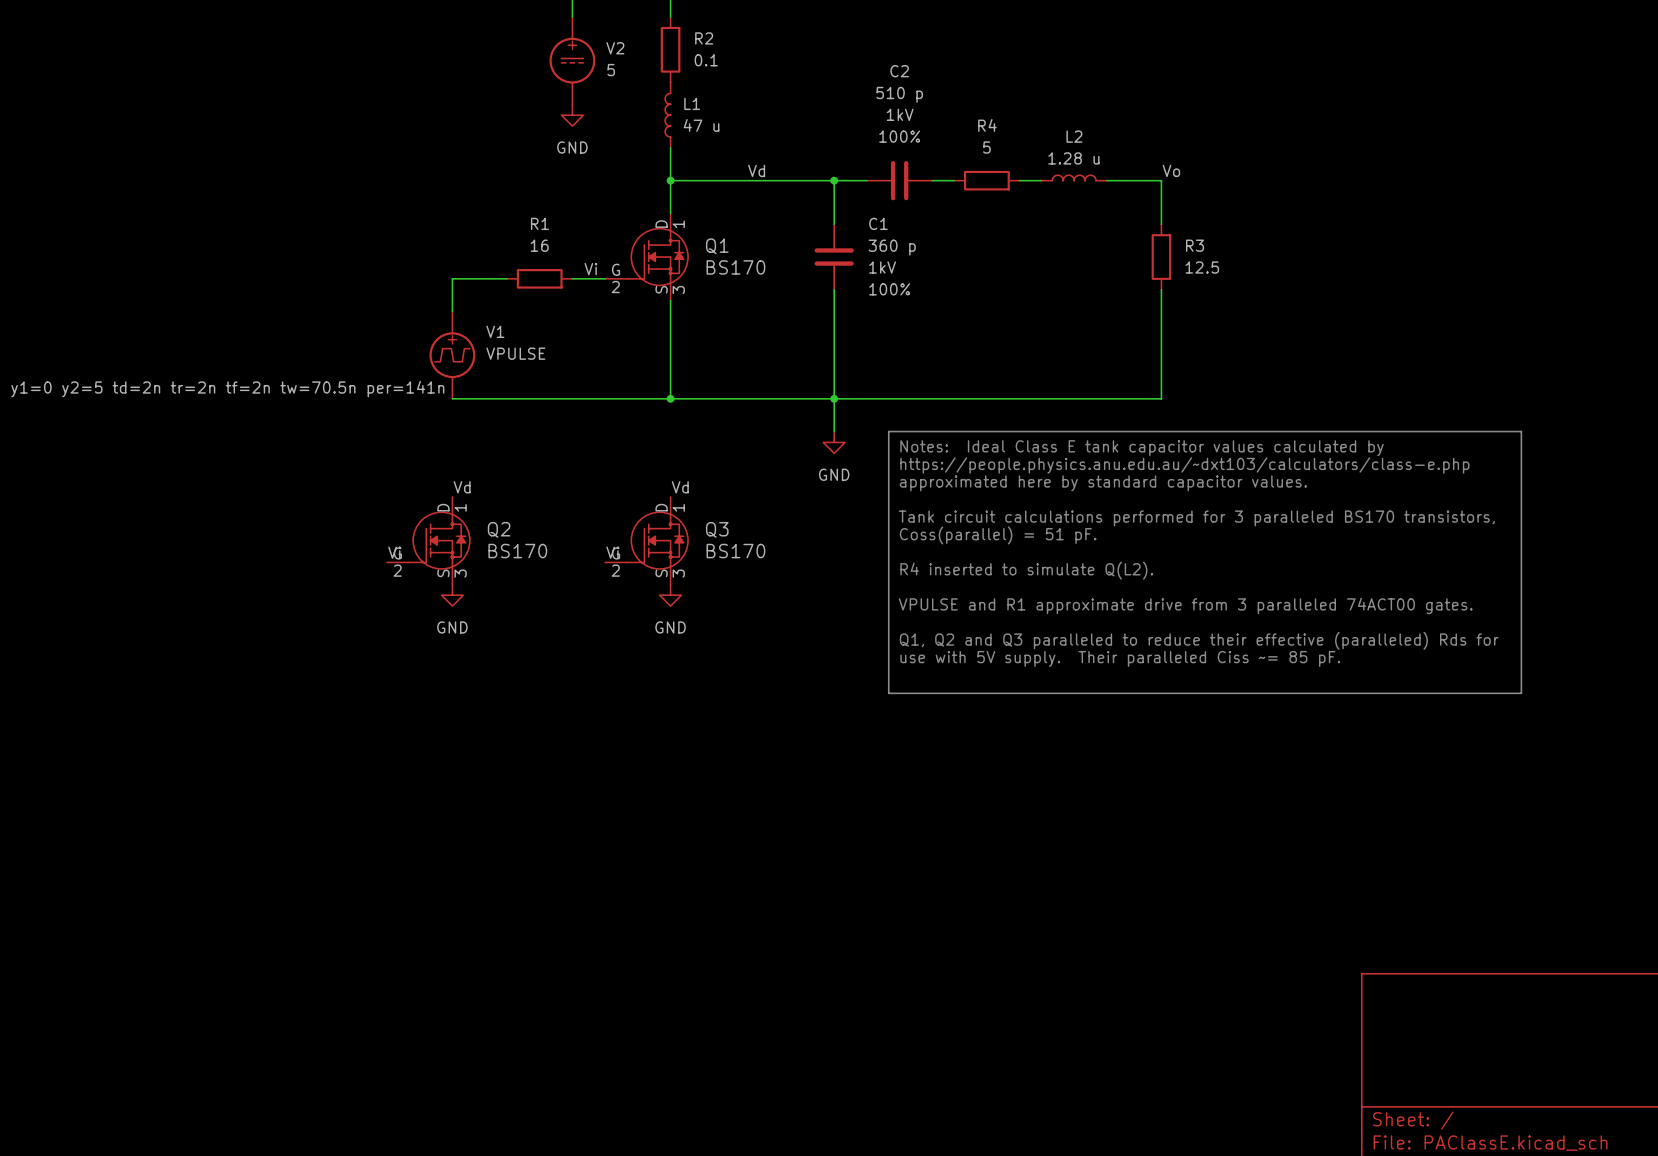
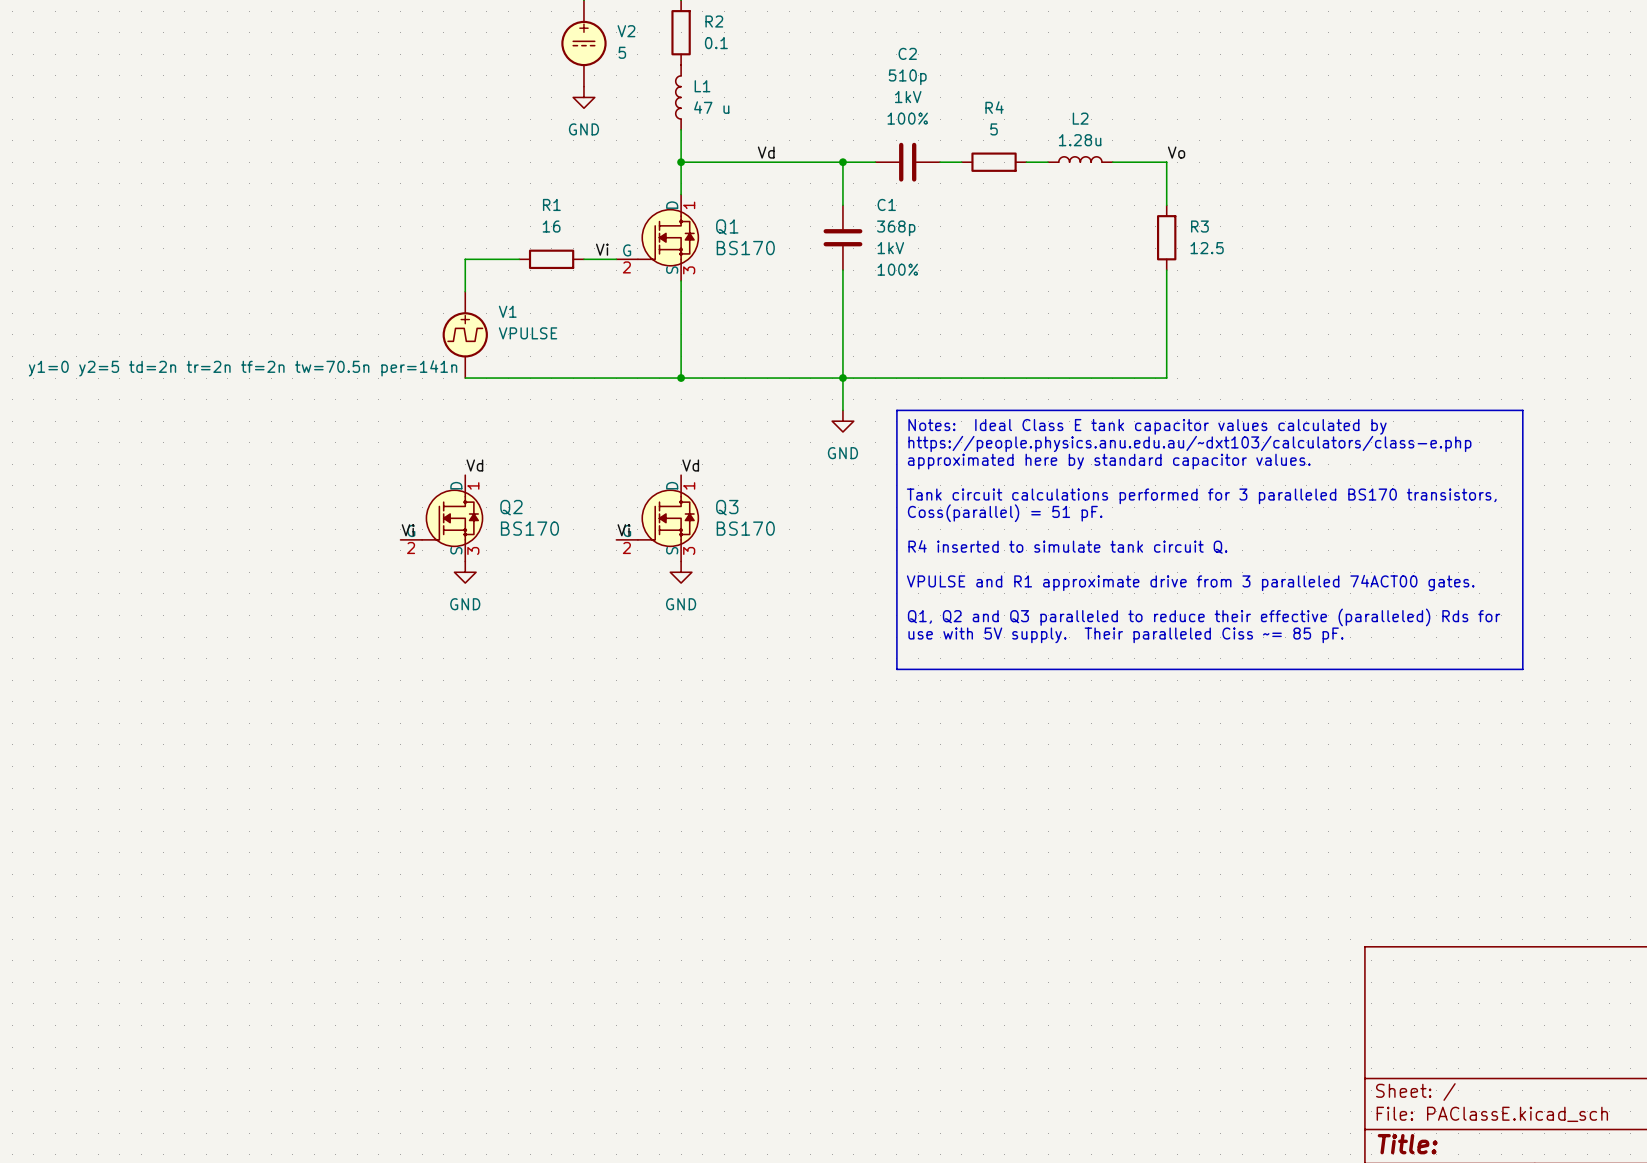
C2 value: 510 p (899, 94) -> 510p (907, 77)
L2 value: 1.28 u (1073, 158) -> 1.28u (1080, 140)
C1 value: 360 p (892, 247) -> 368p (896, 228)
text: R4 inserted to simulate Q(L2). (1026, 570) -> R4 inserted to simulate tank circuit Q. (1067, 546)

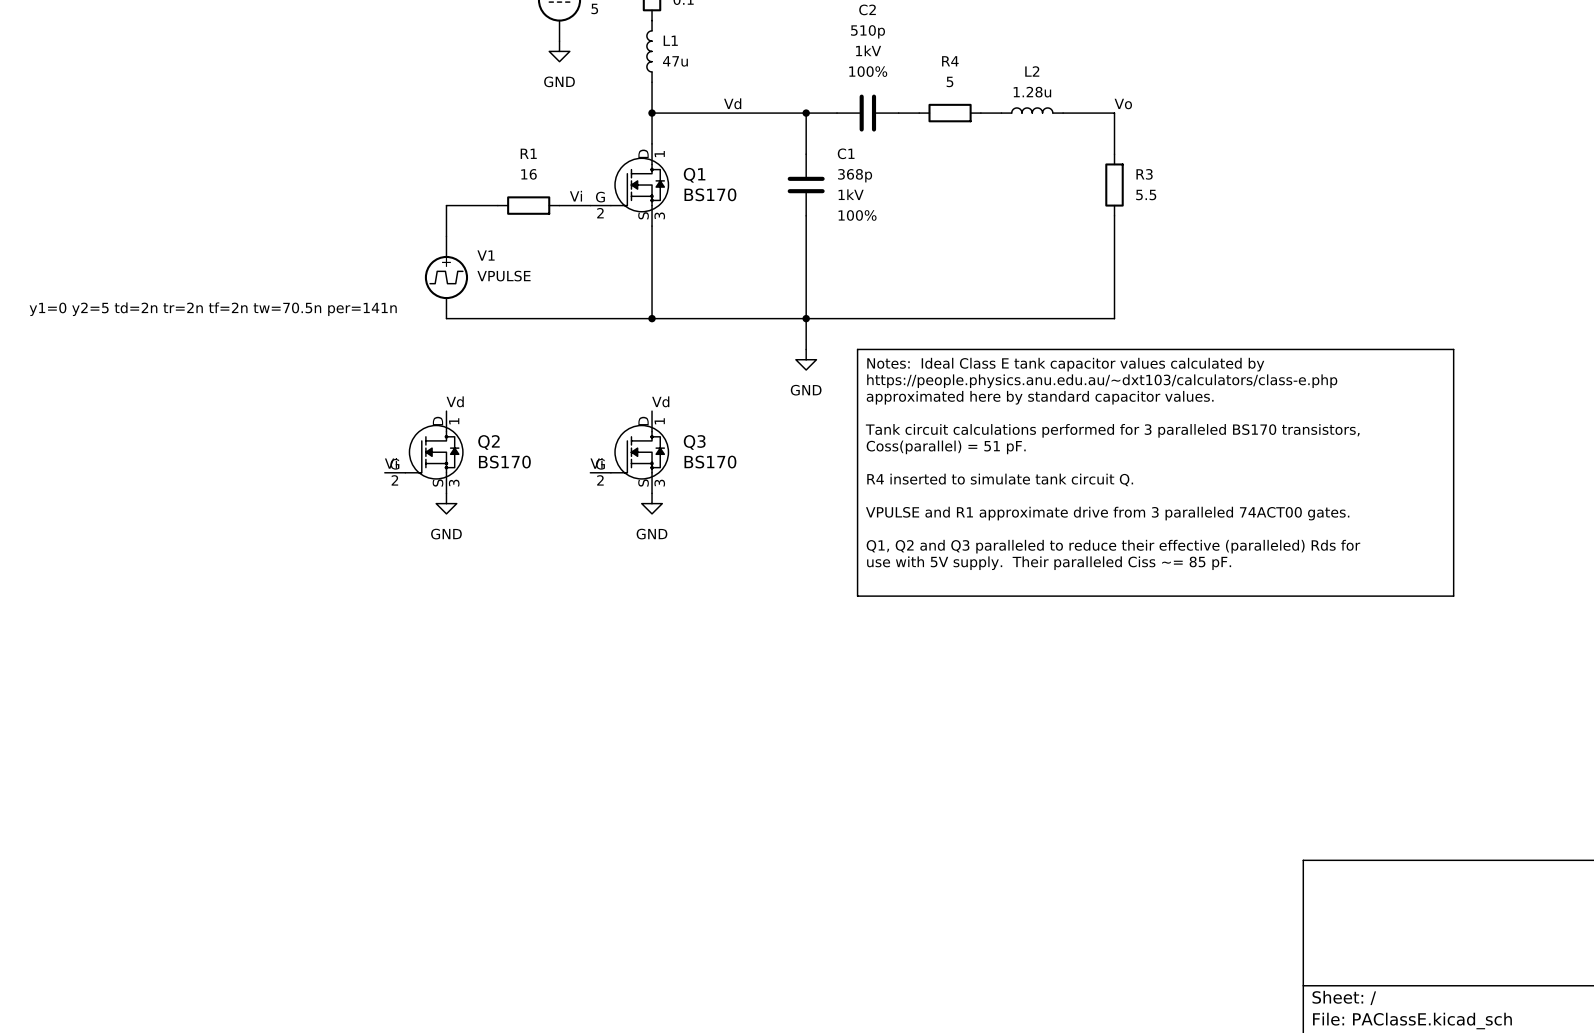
L1 value: 47 u (711, 107) -> 47u (675, 61)
R3 value: 12.5 (1207, 248) -> 5.5 (1146, 195)

